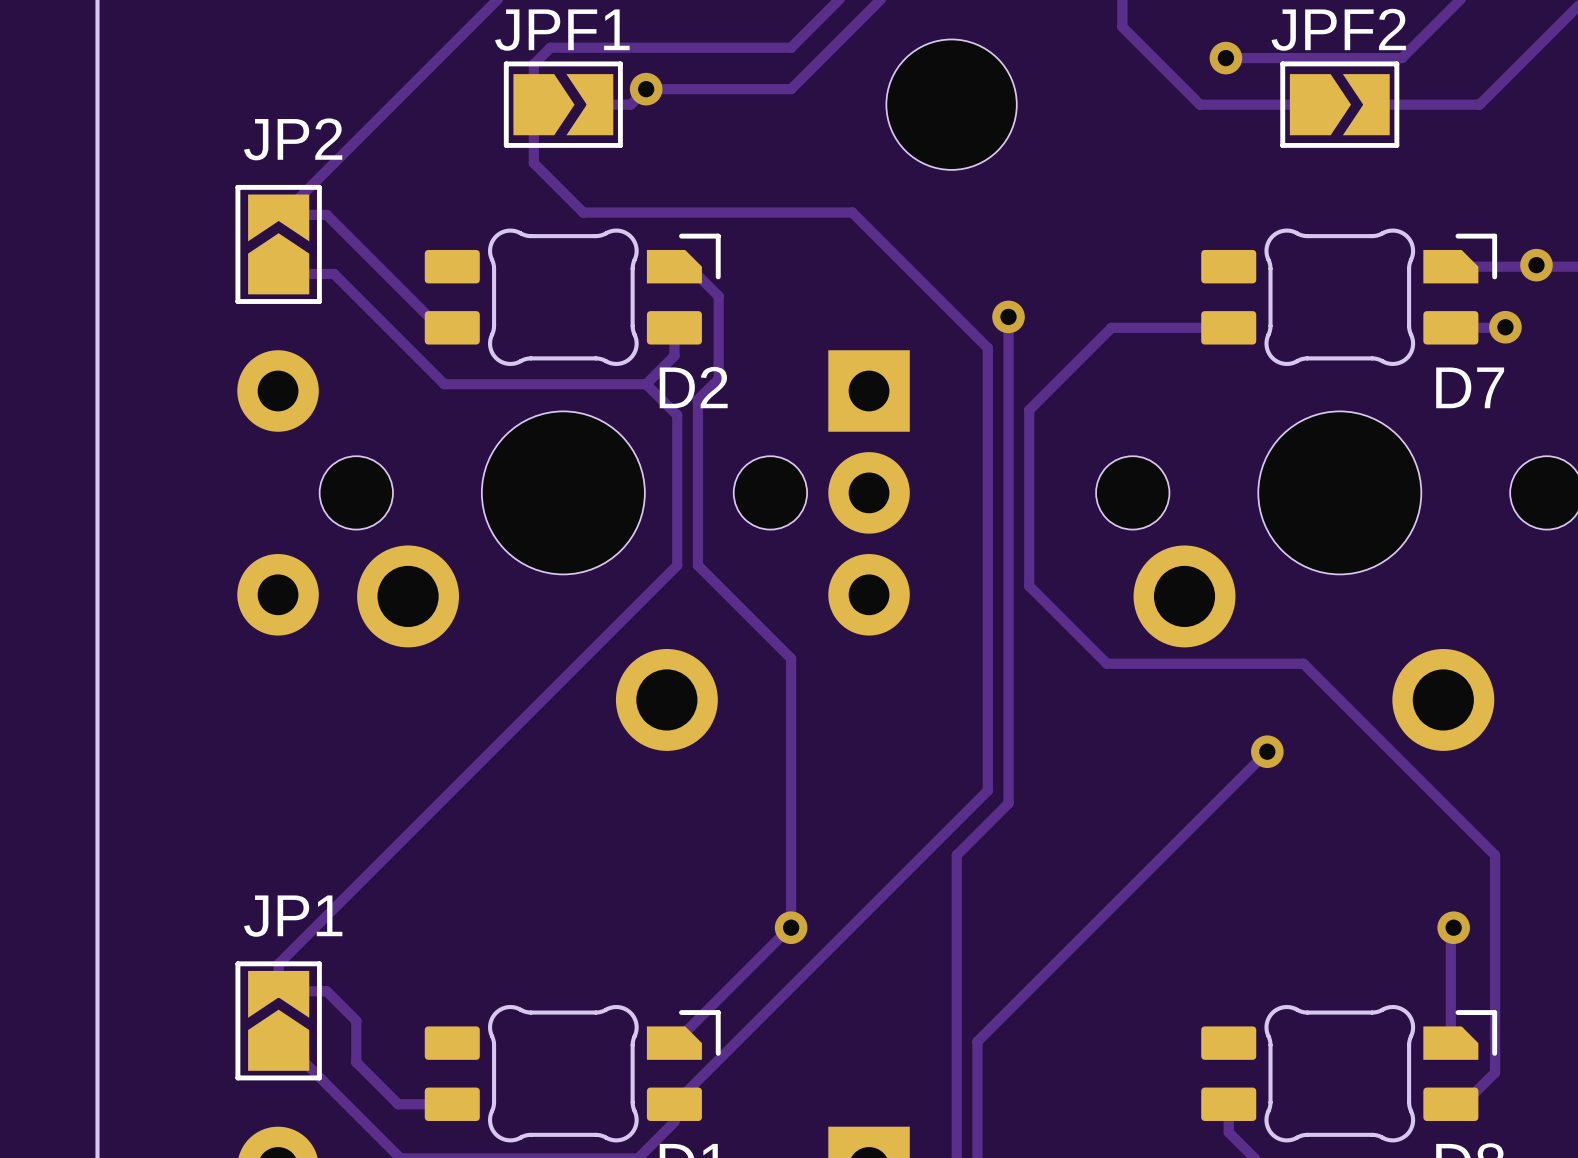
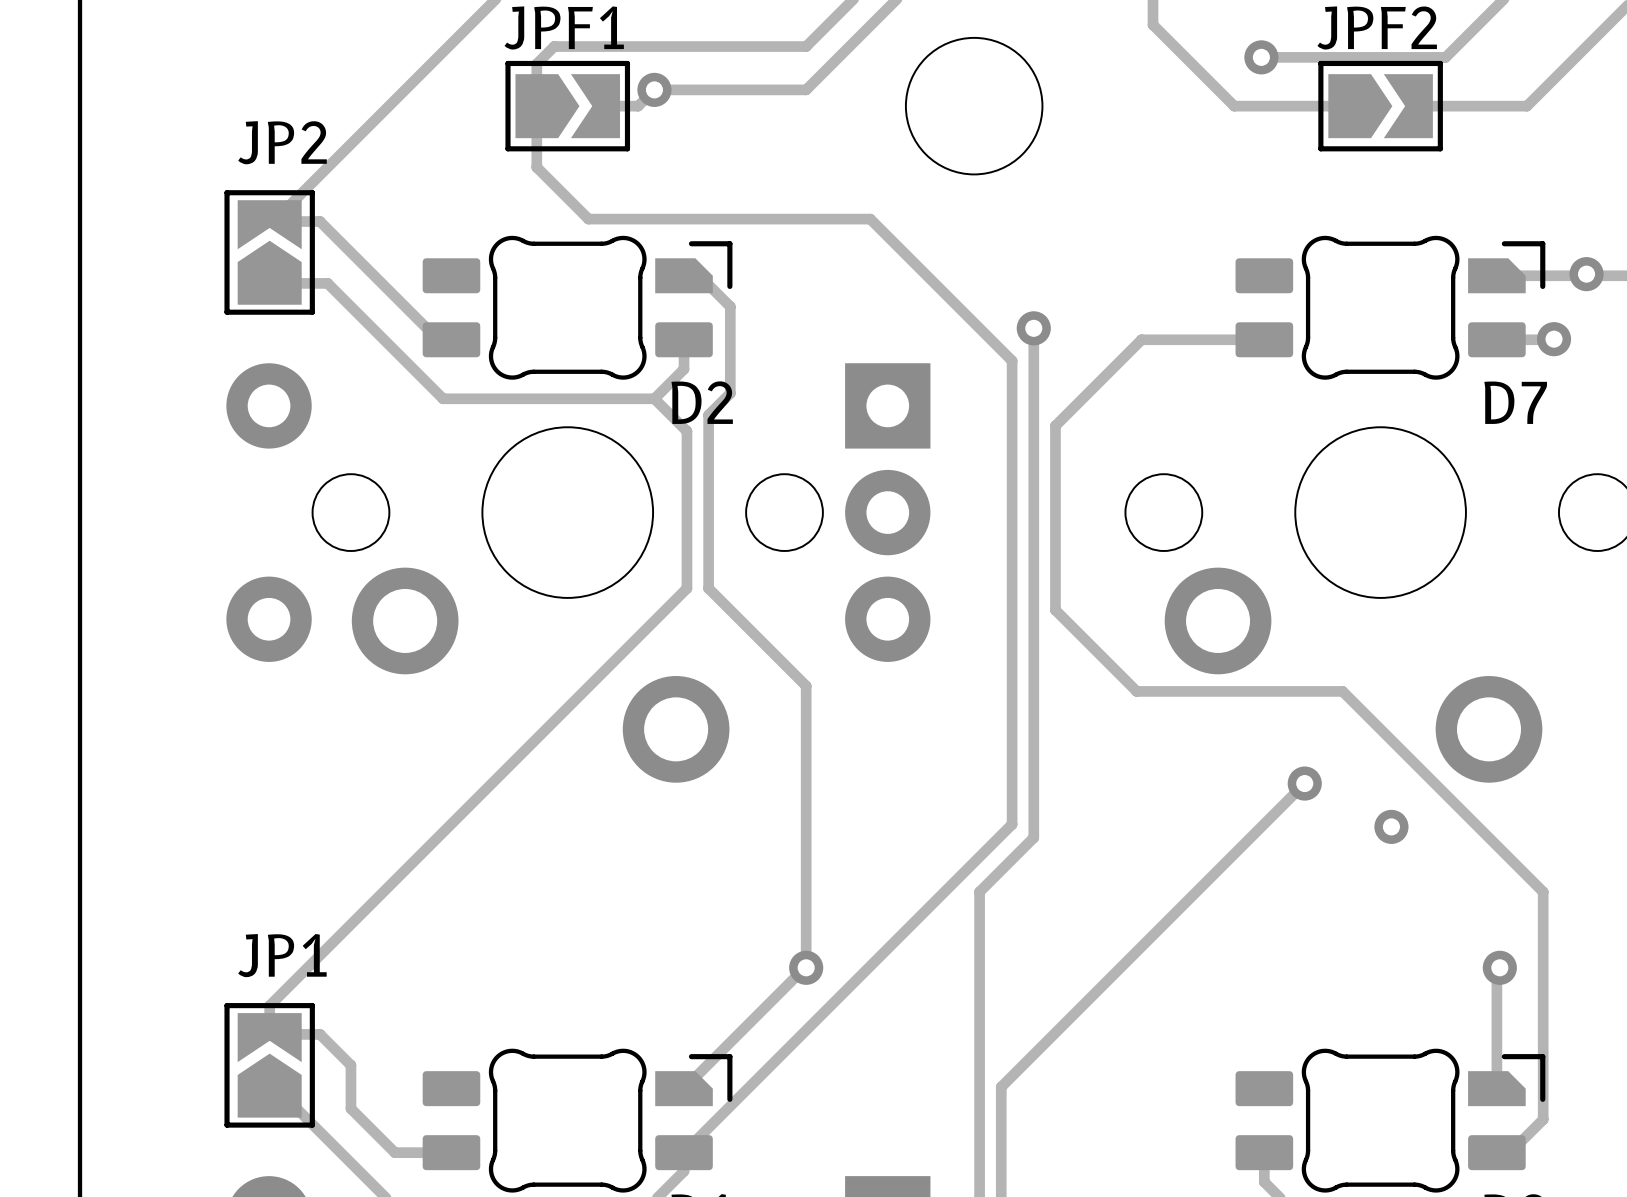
via: none -> (1391, 826)

